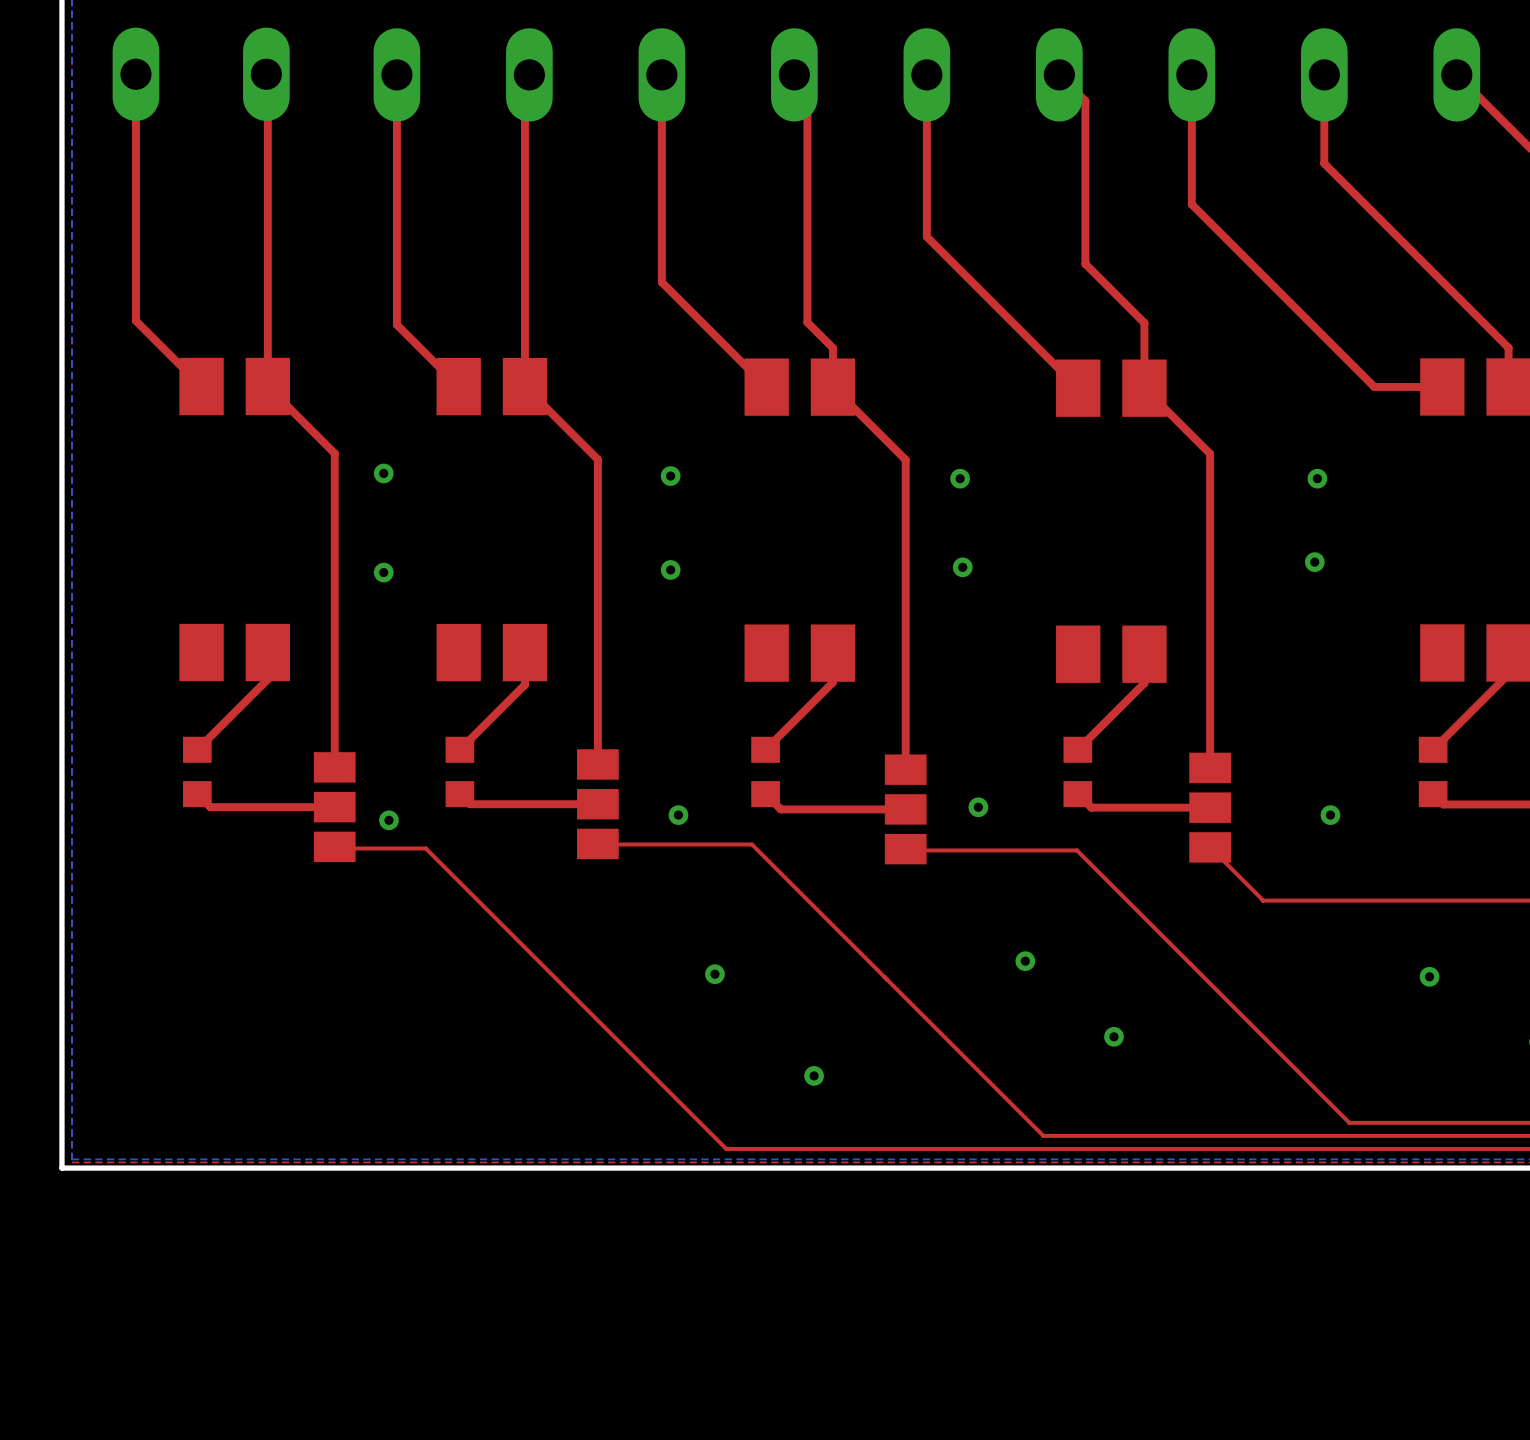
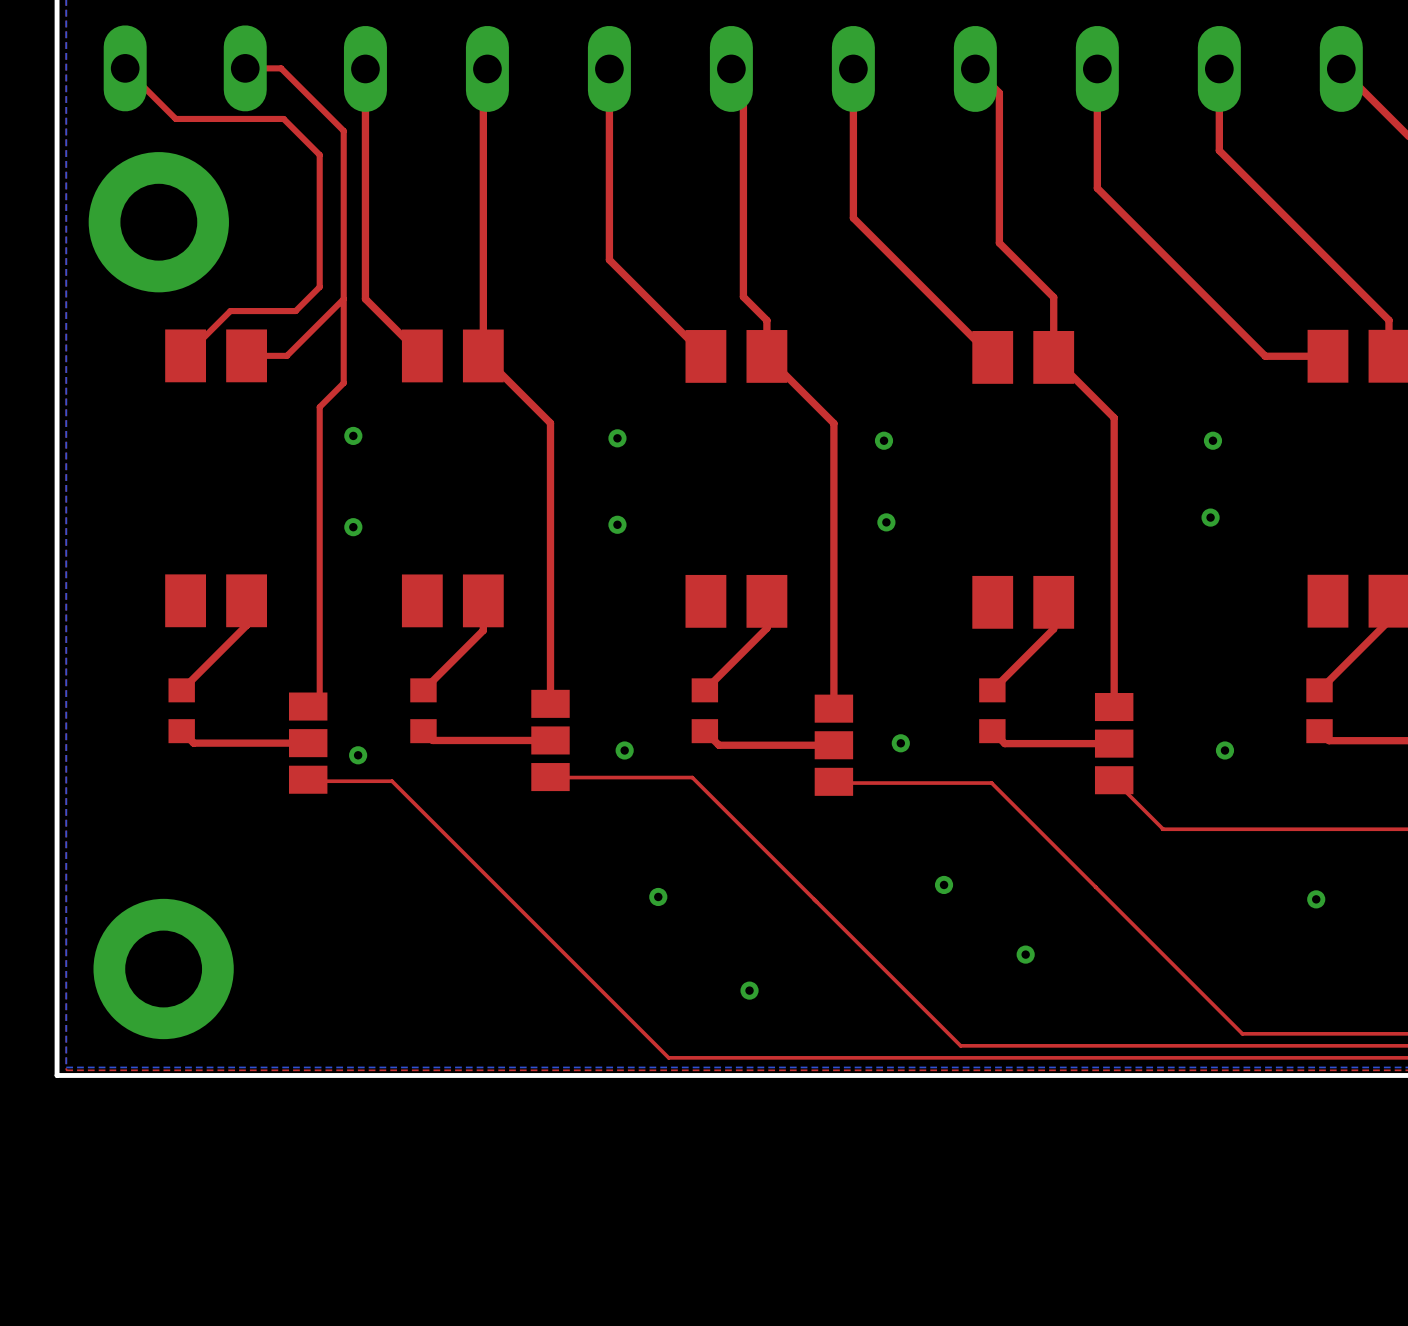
top track: (135, 74) (135, 320) (201, 386) -> (125, 68) (175, 118) (283, 118) (319, 154) (319, 287) (295, 311) (230, 311) (185, 355)
top track: (266, 74) (267, 386) (334, 453) (334, 767) -> (245, 68) (281, 68) (343, 130) (343, 383) (319, 407) (319, 695) (308, 706)
part: none -> (158, 222)
top track: none -> (343, 299) (286, 355) (246, 355)
part: none -> (163, 969)

